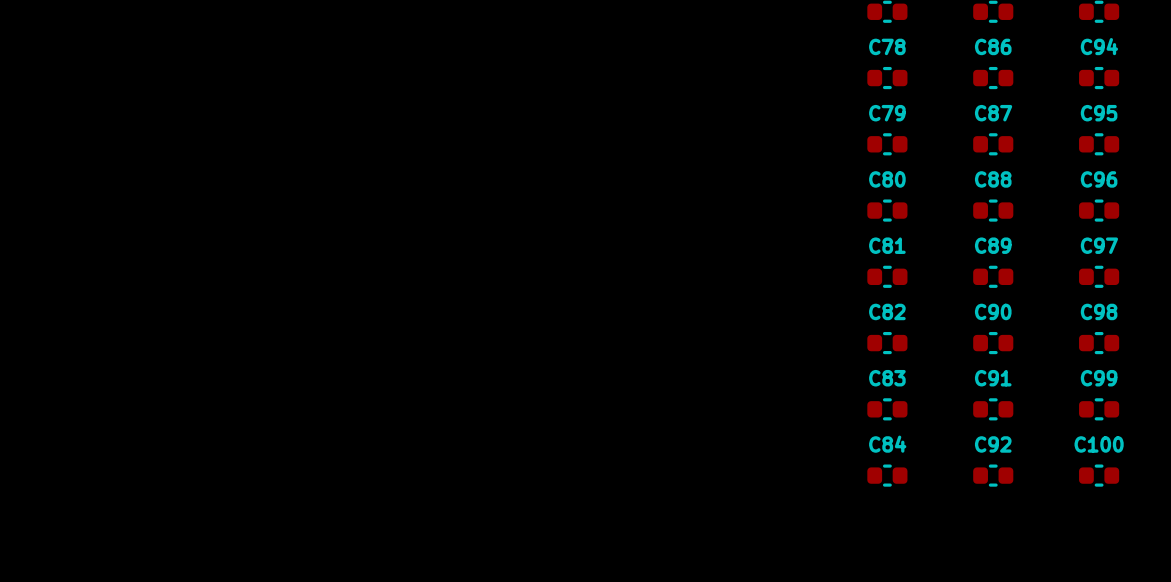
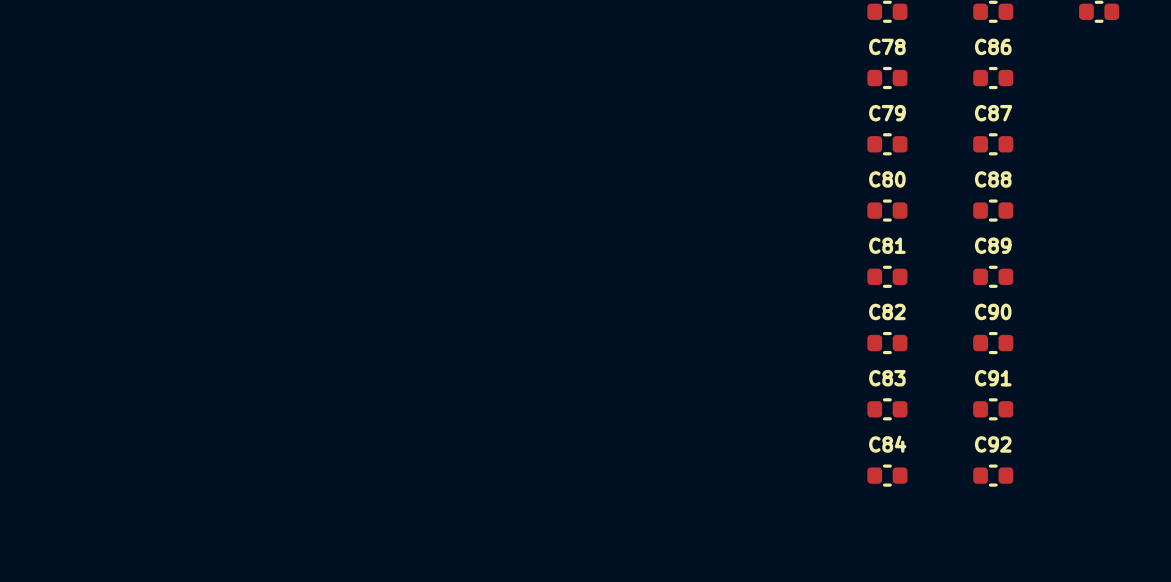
C94: (1099, 78) -> none
C95: (1099, 144) -> none
C96: (1099, 210) -> none
C97: (1099, 276) -> none
C98: (1099, 343) -> none
C99: (1099, 409) -> none
C100: (1099, 475) -> none

